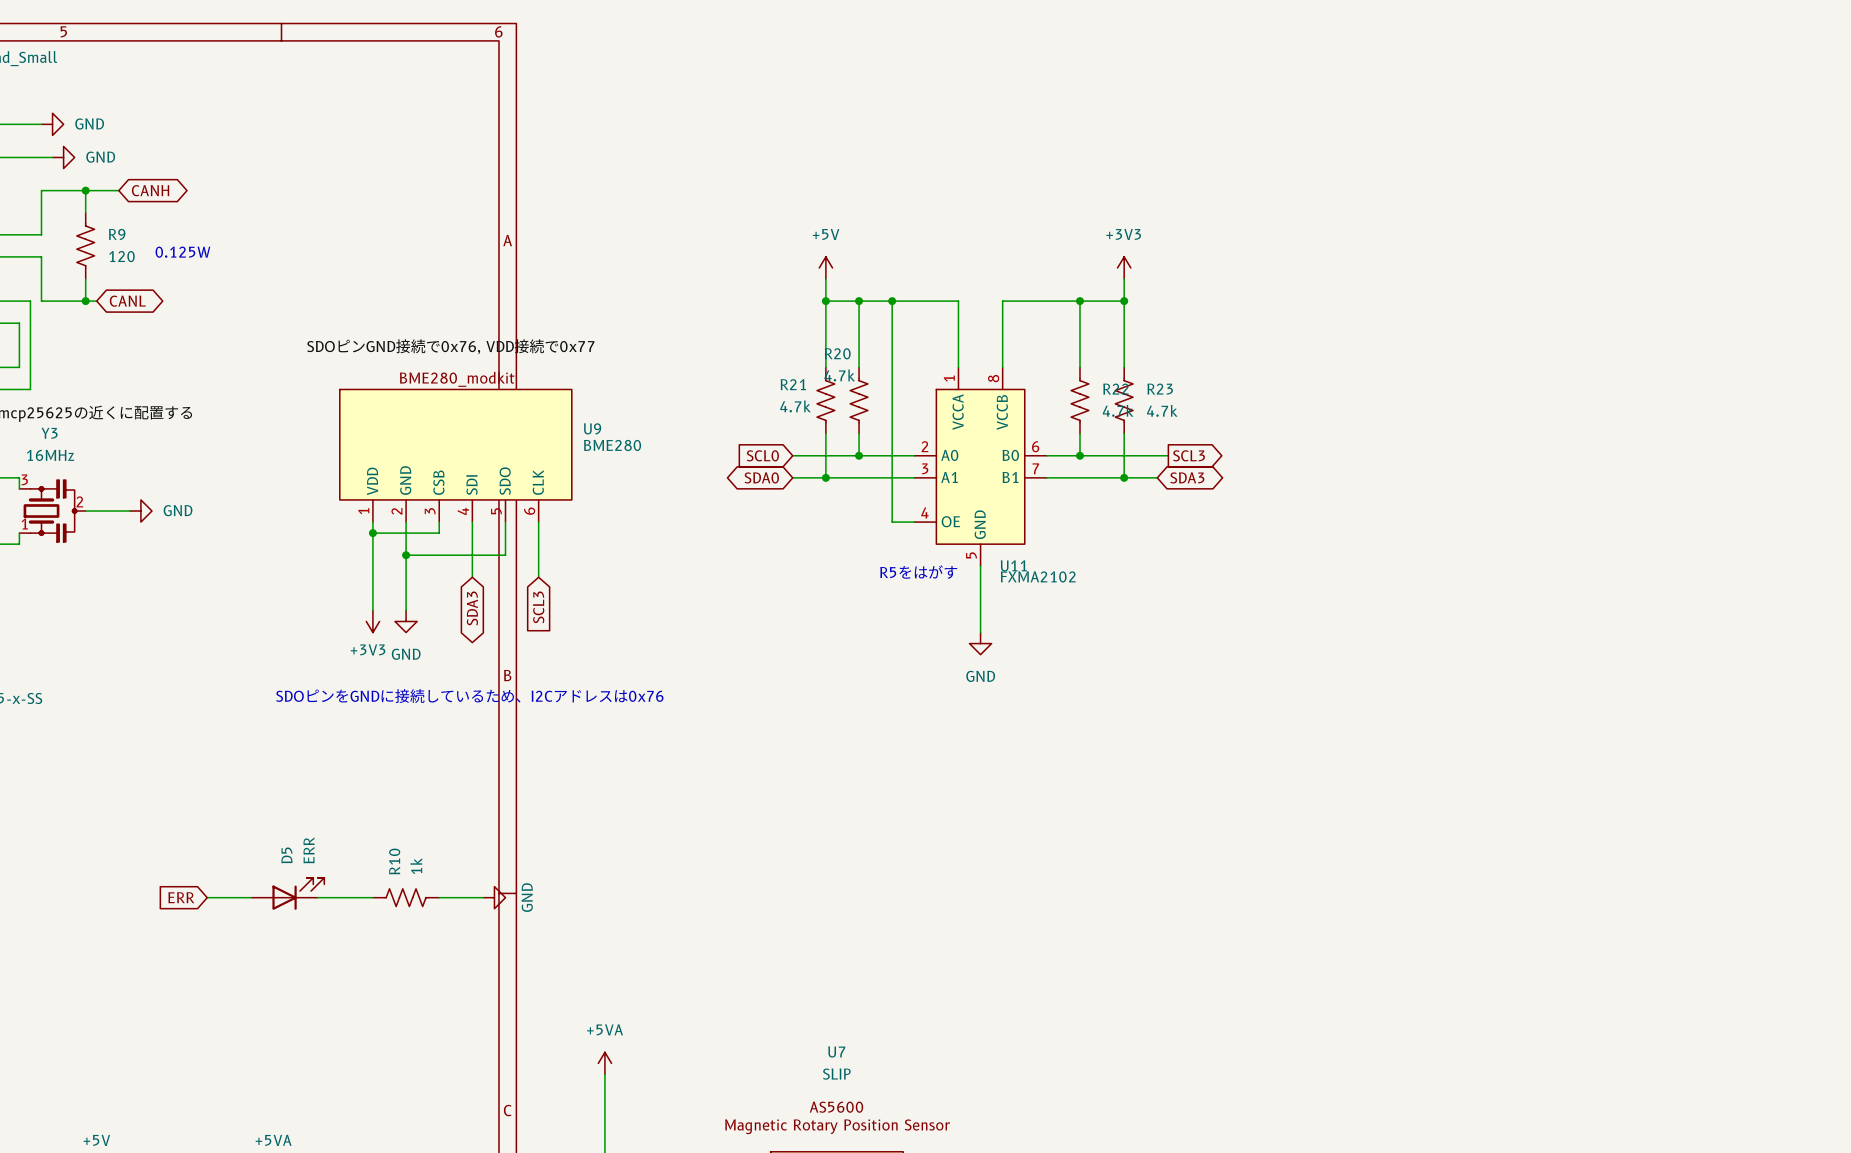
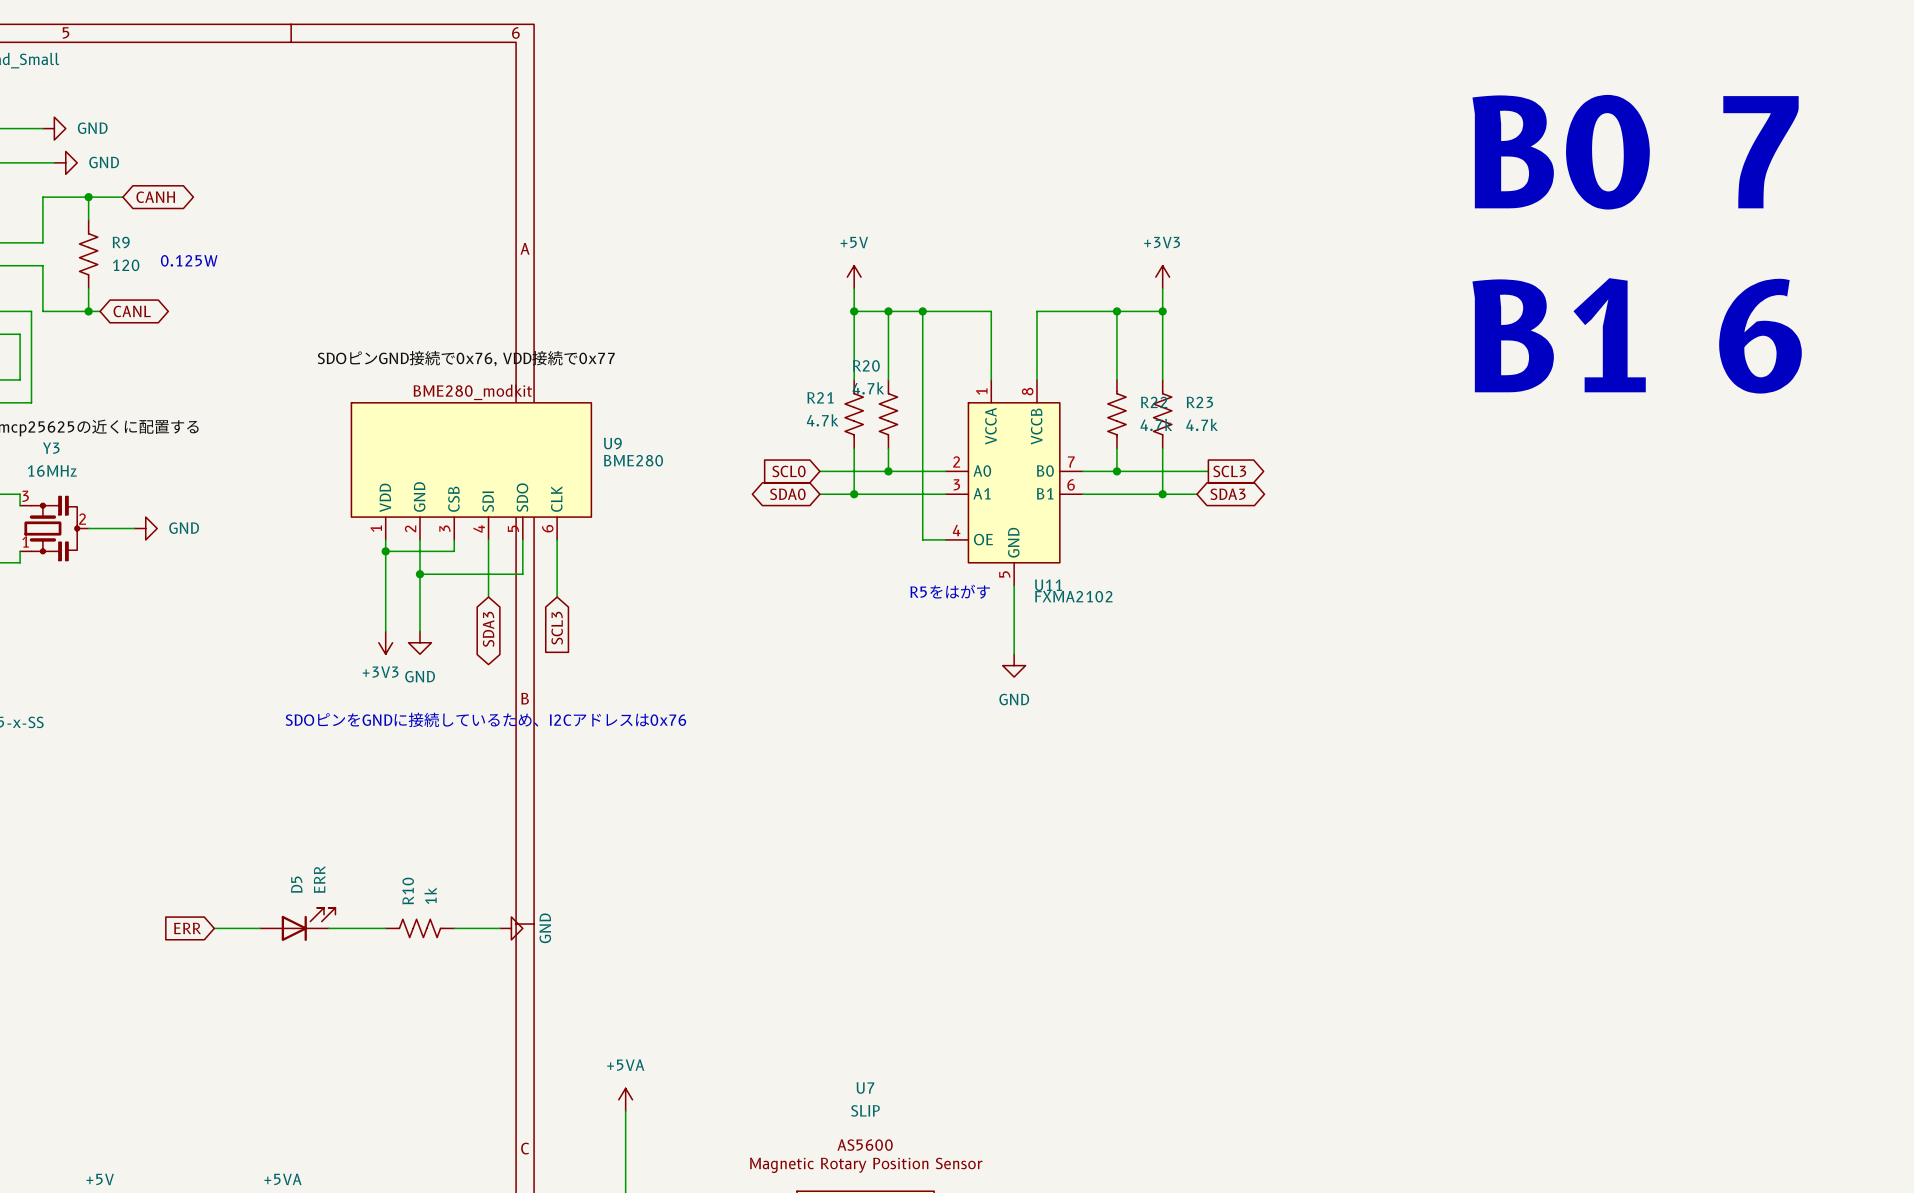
text: none -> B0 7 (1635, 152)
text: none -> B1 6 (1637, 335)
U11 pin number: 6 (1035, 446) -> 7 (1071, 462)
U11 pin number: 7 (1035, 468) -> 6 (1071, 484)

